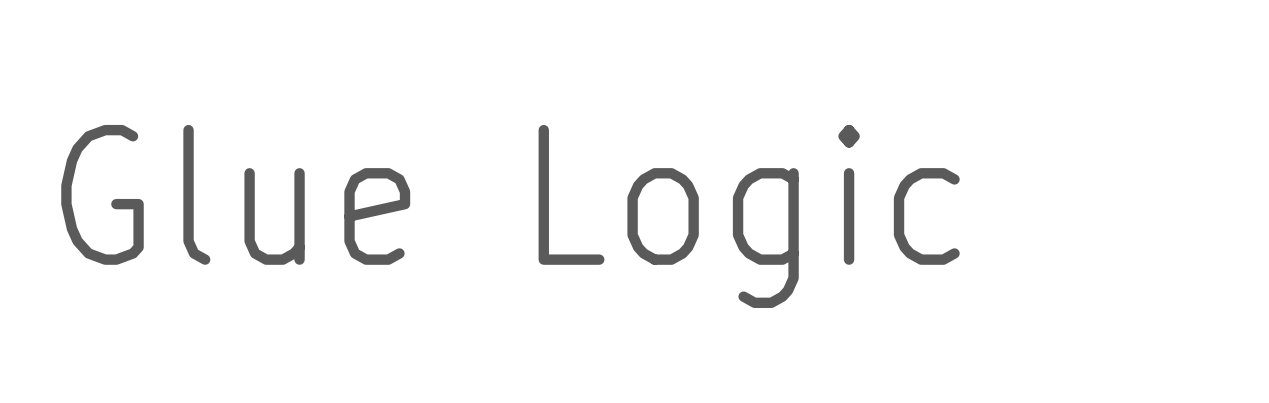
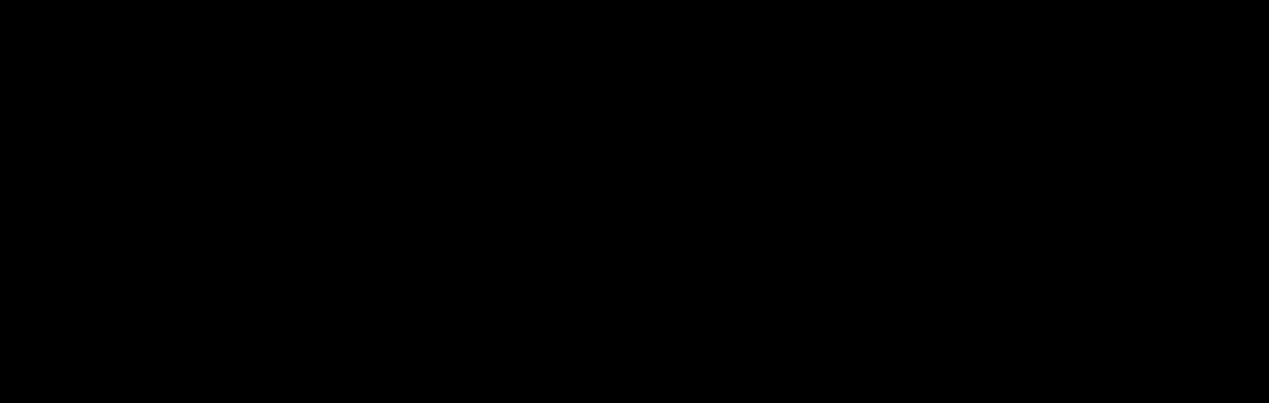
text: Glue Logic (510, 216) -> none

